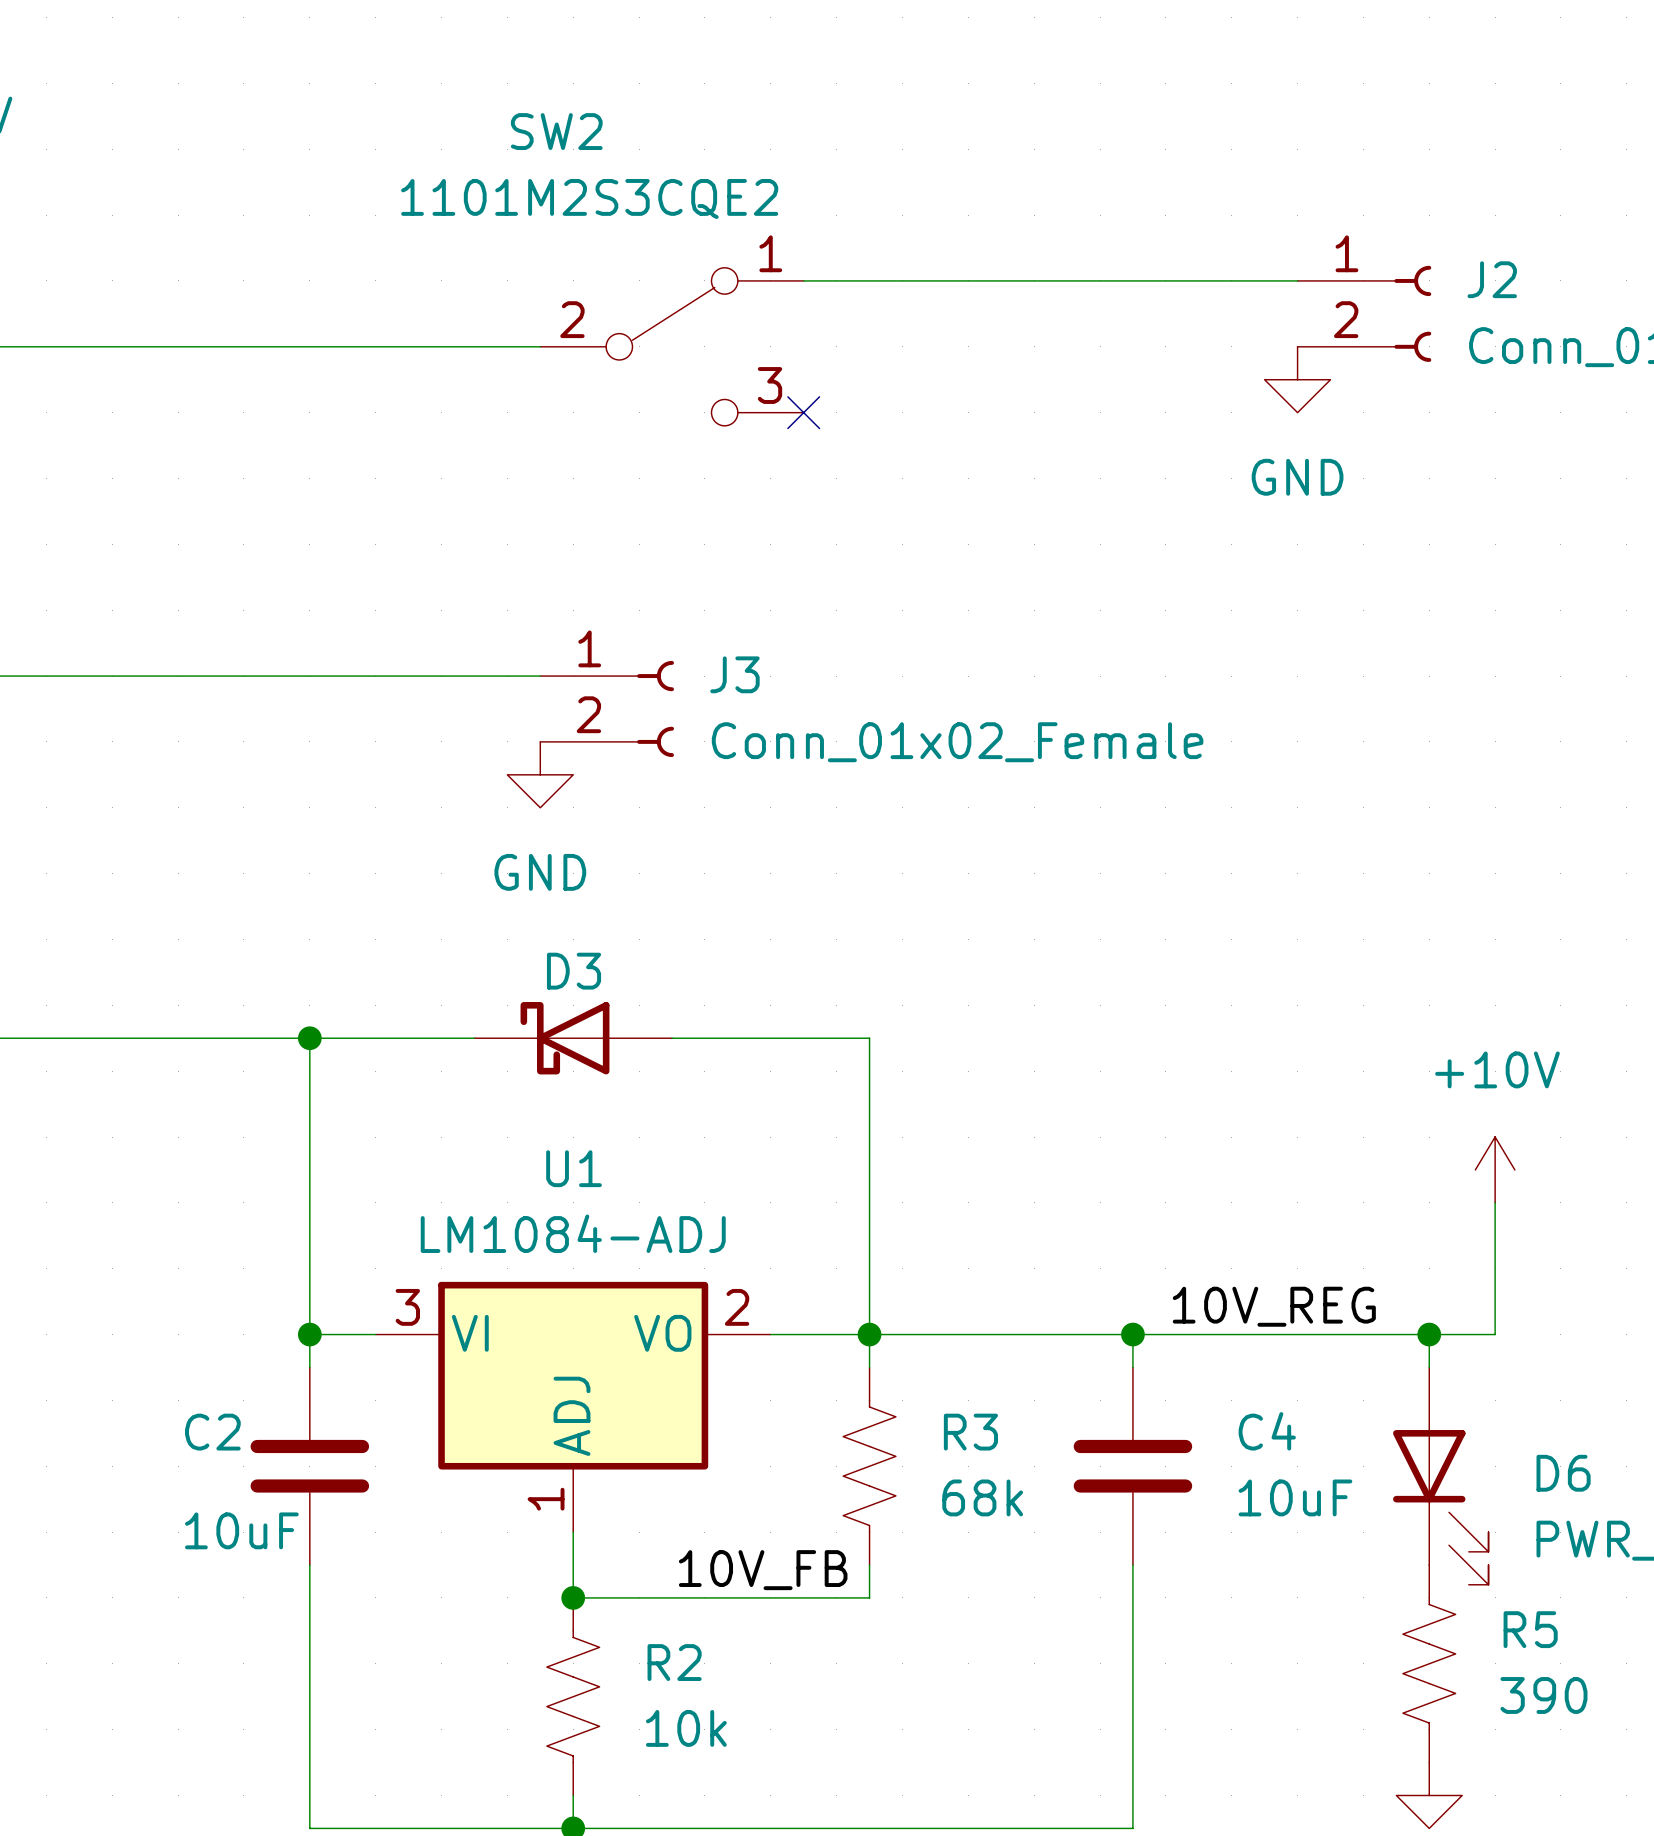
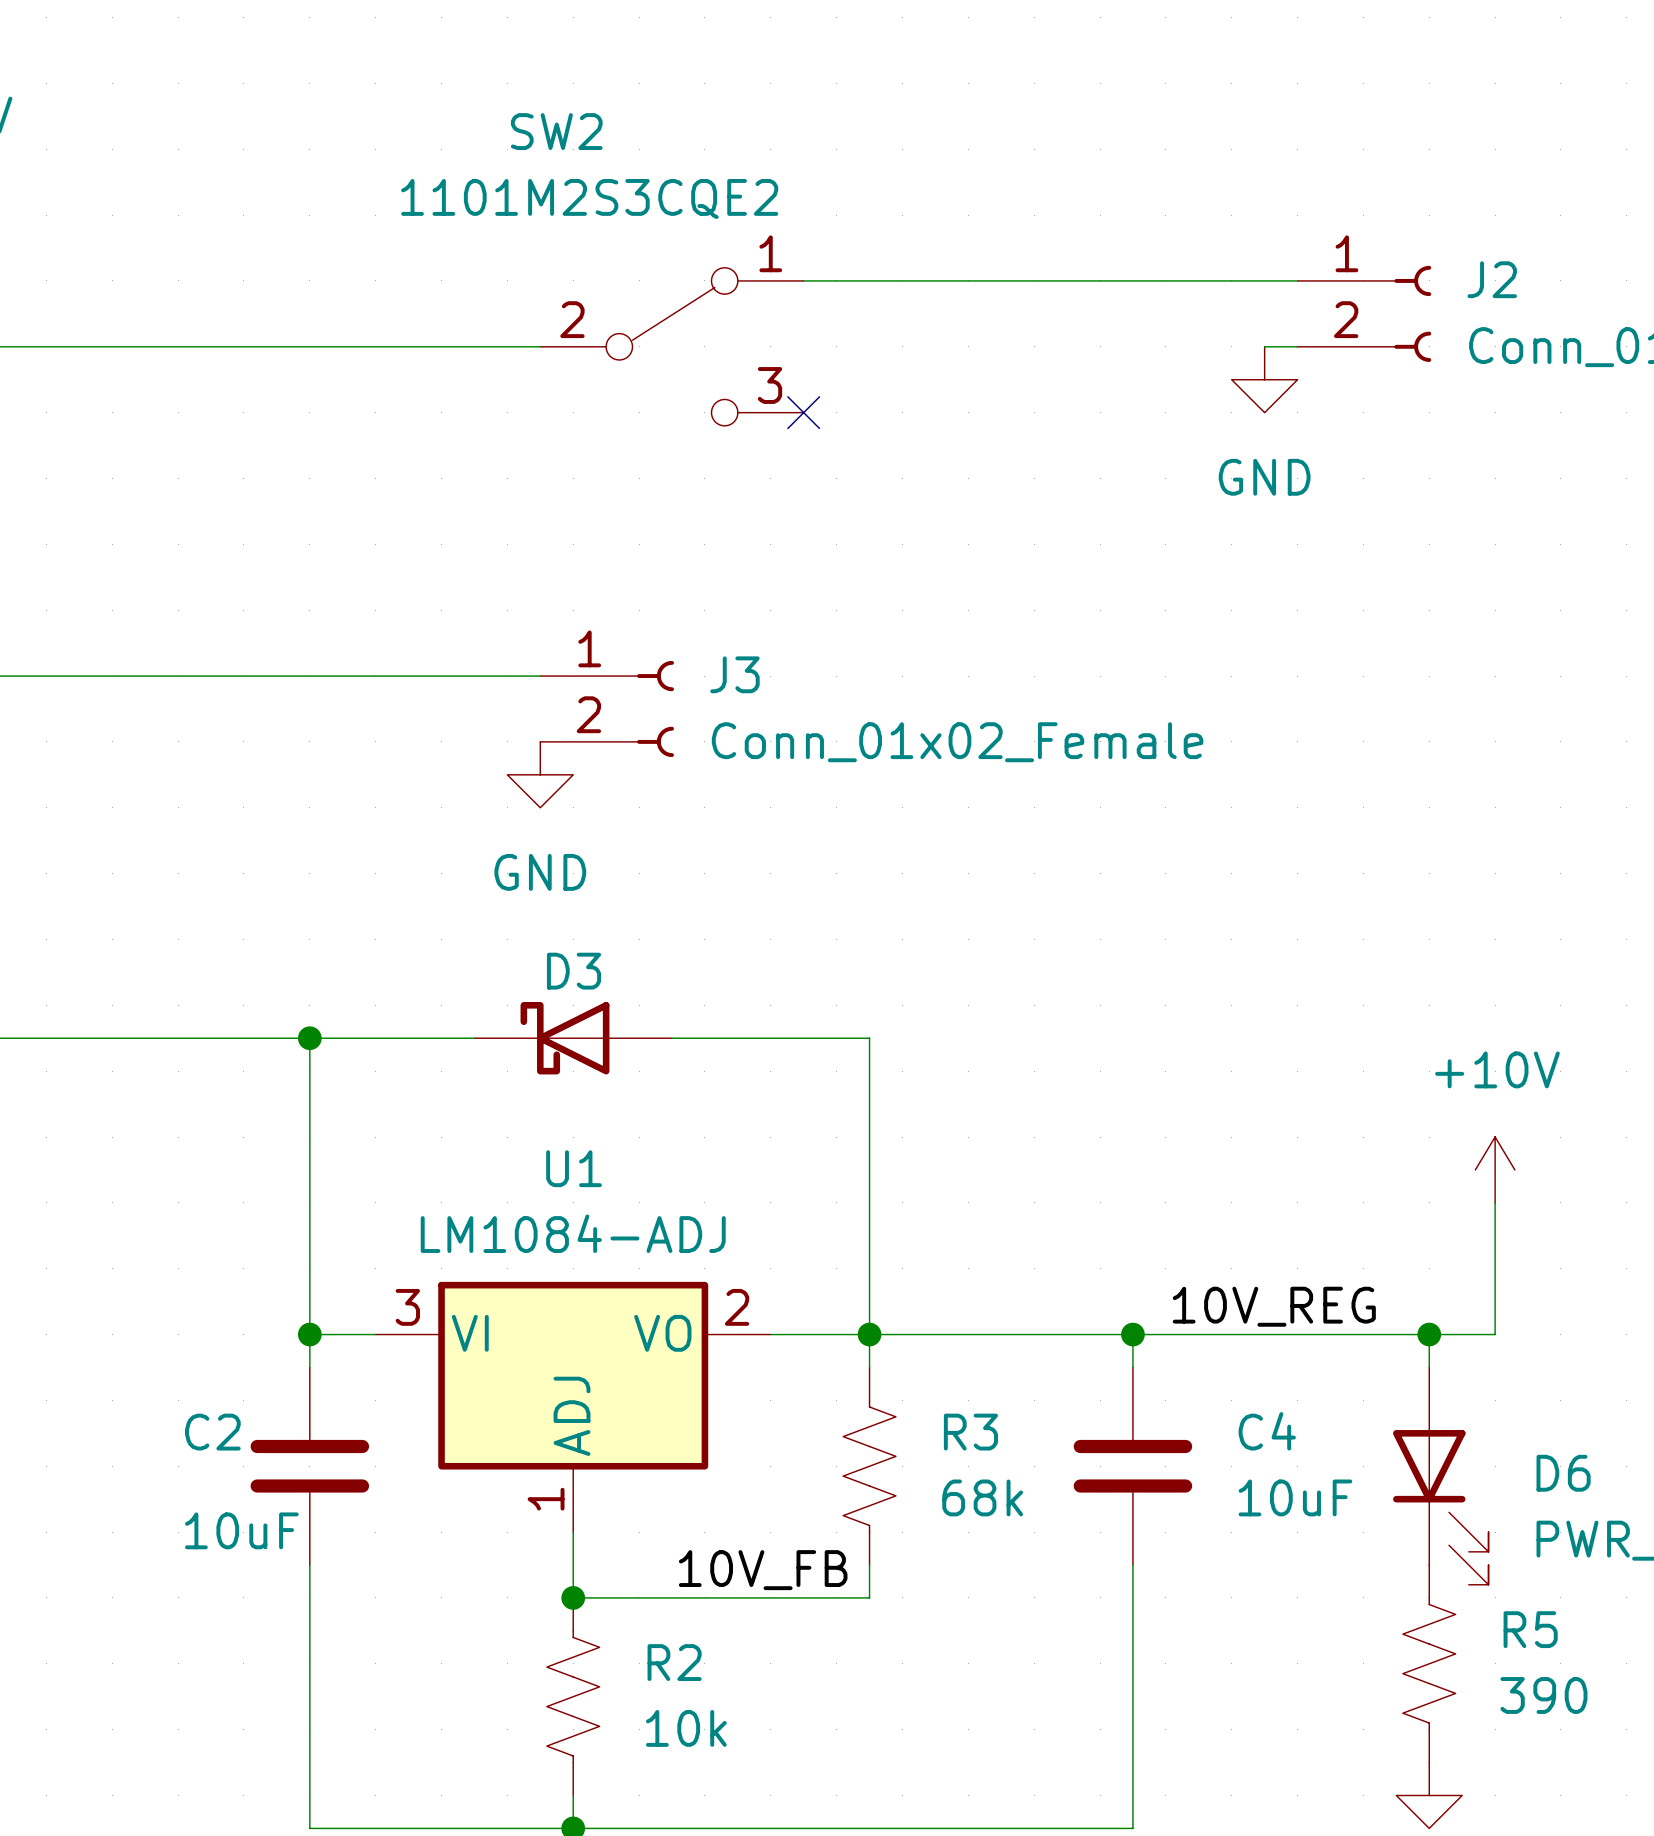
wire: none -> (1264, 346) (1297, 346)
power symbol position: GND (1297, 379) -> GND (1264, 379)

